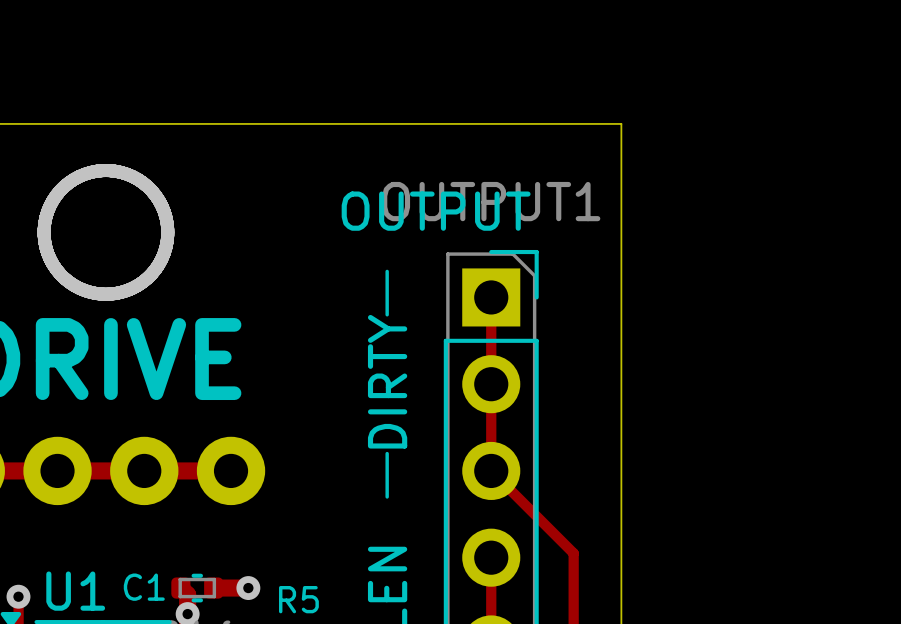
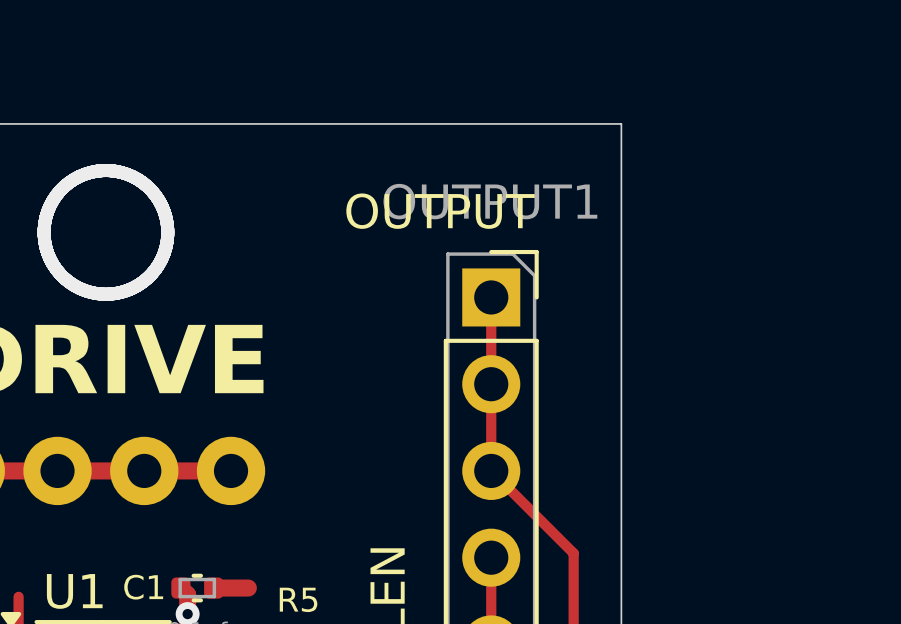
line: (387, 271) (387, 314) -> none
text: DIRTY (387, 381) -> none
line: (387, 453) (387, 496) -> none
via: (248, 588) -> none
via: (18, 596) -> none

